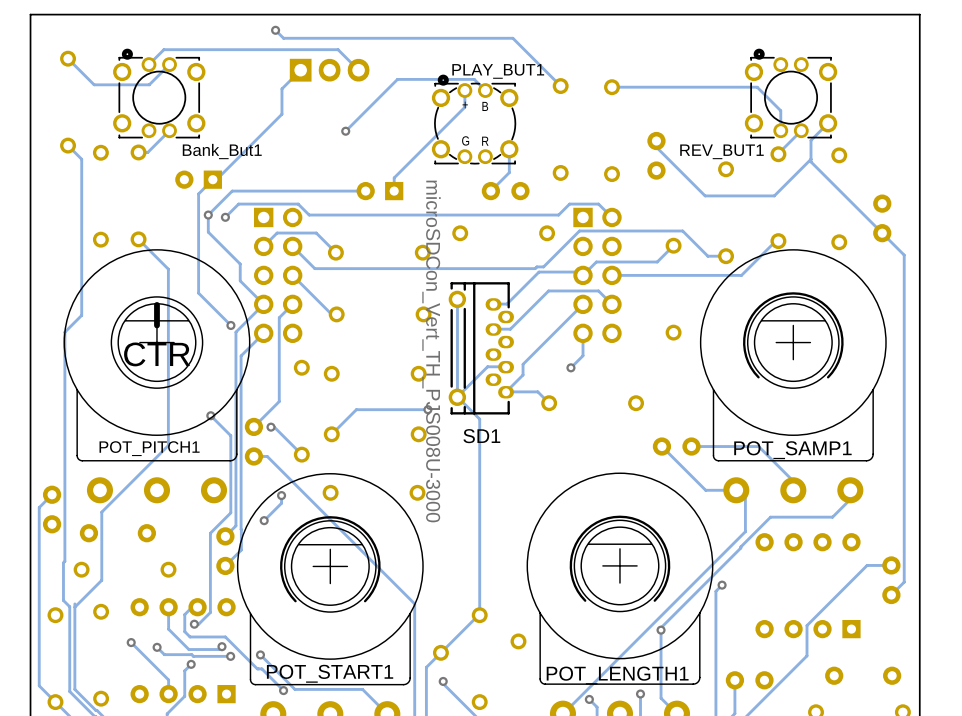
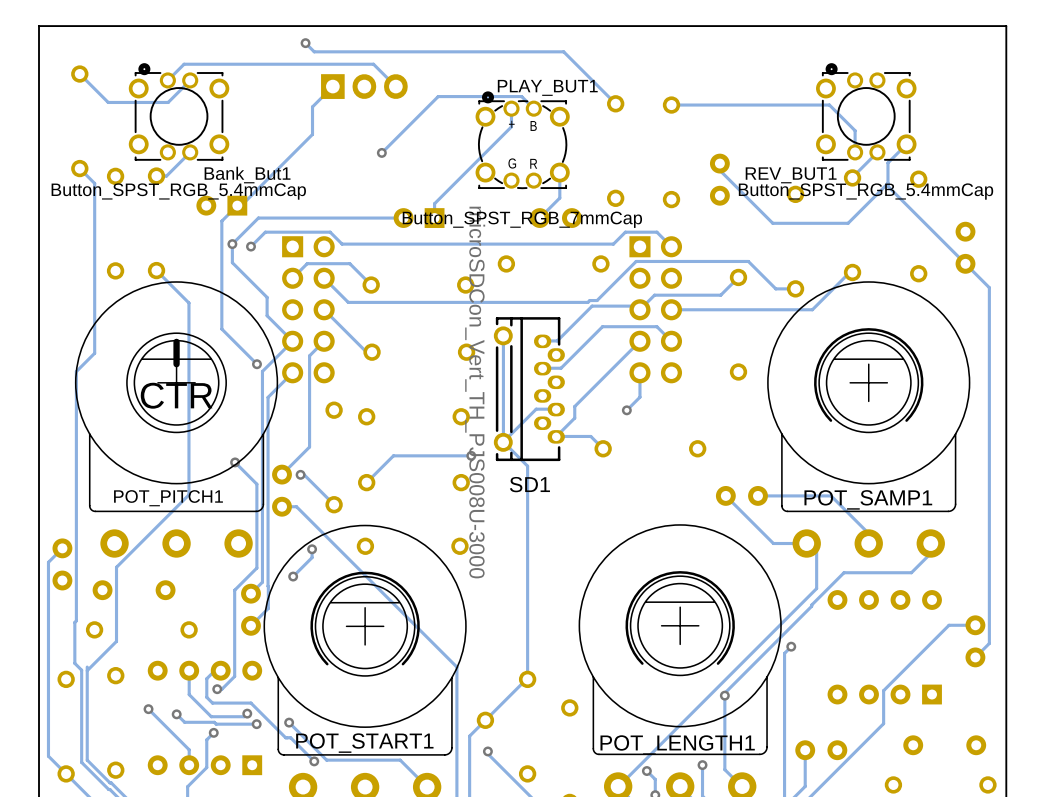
Bank_But1 value: none -> Button_SPST_RGB_5.4mmCap (178, 191)
REV_BUT1 value: none -> Button_SPST_RGB_5.4mmCap (866, 191)
PLAY_BUT1 value: none -> Button_SPST_RGB_7mmCap (522, 219)

